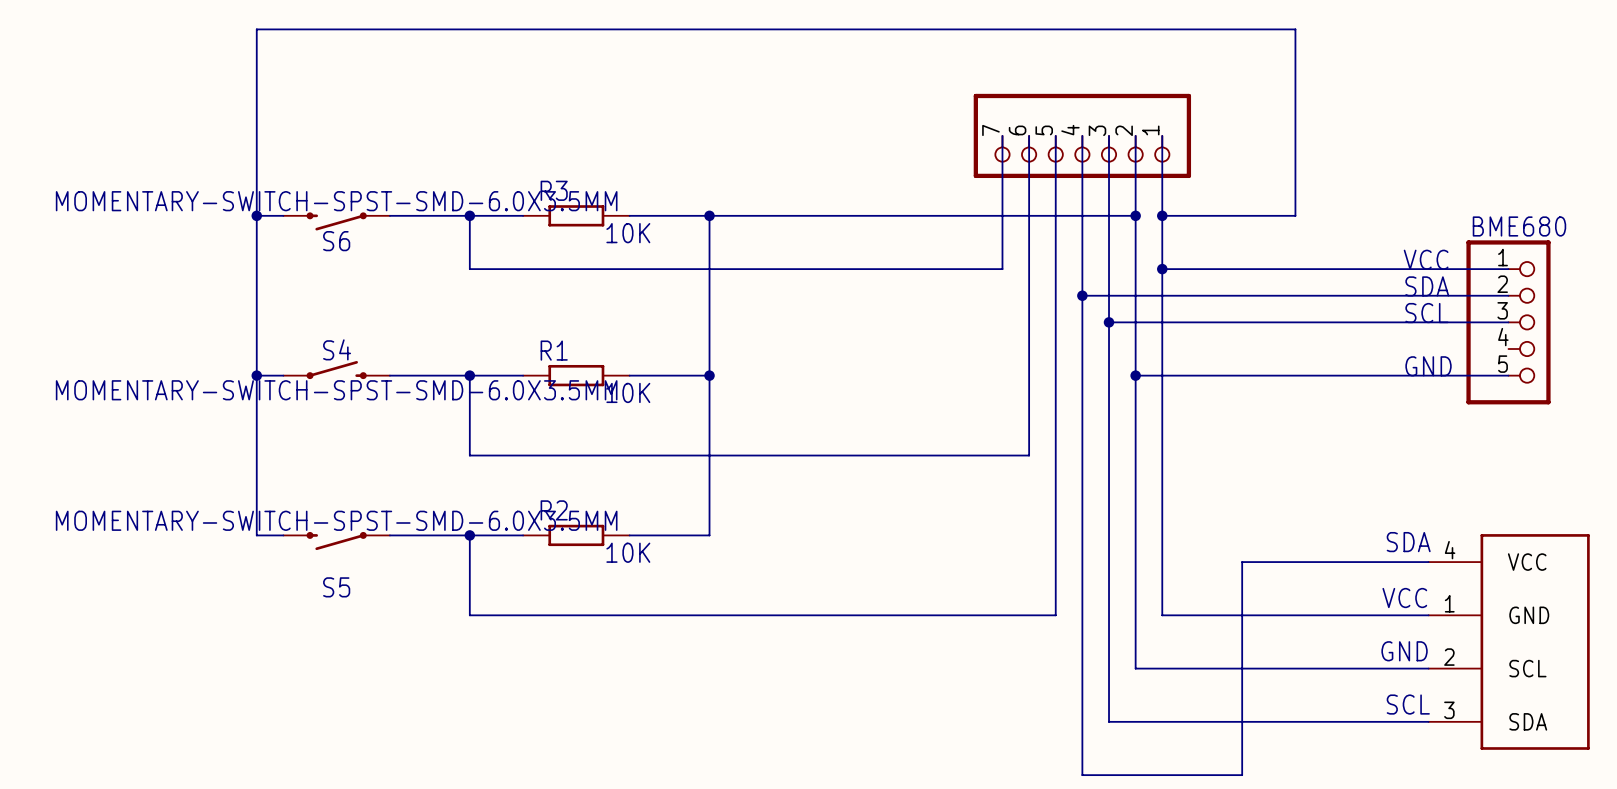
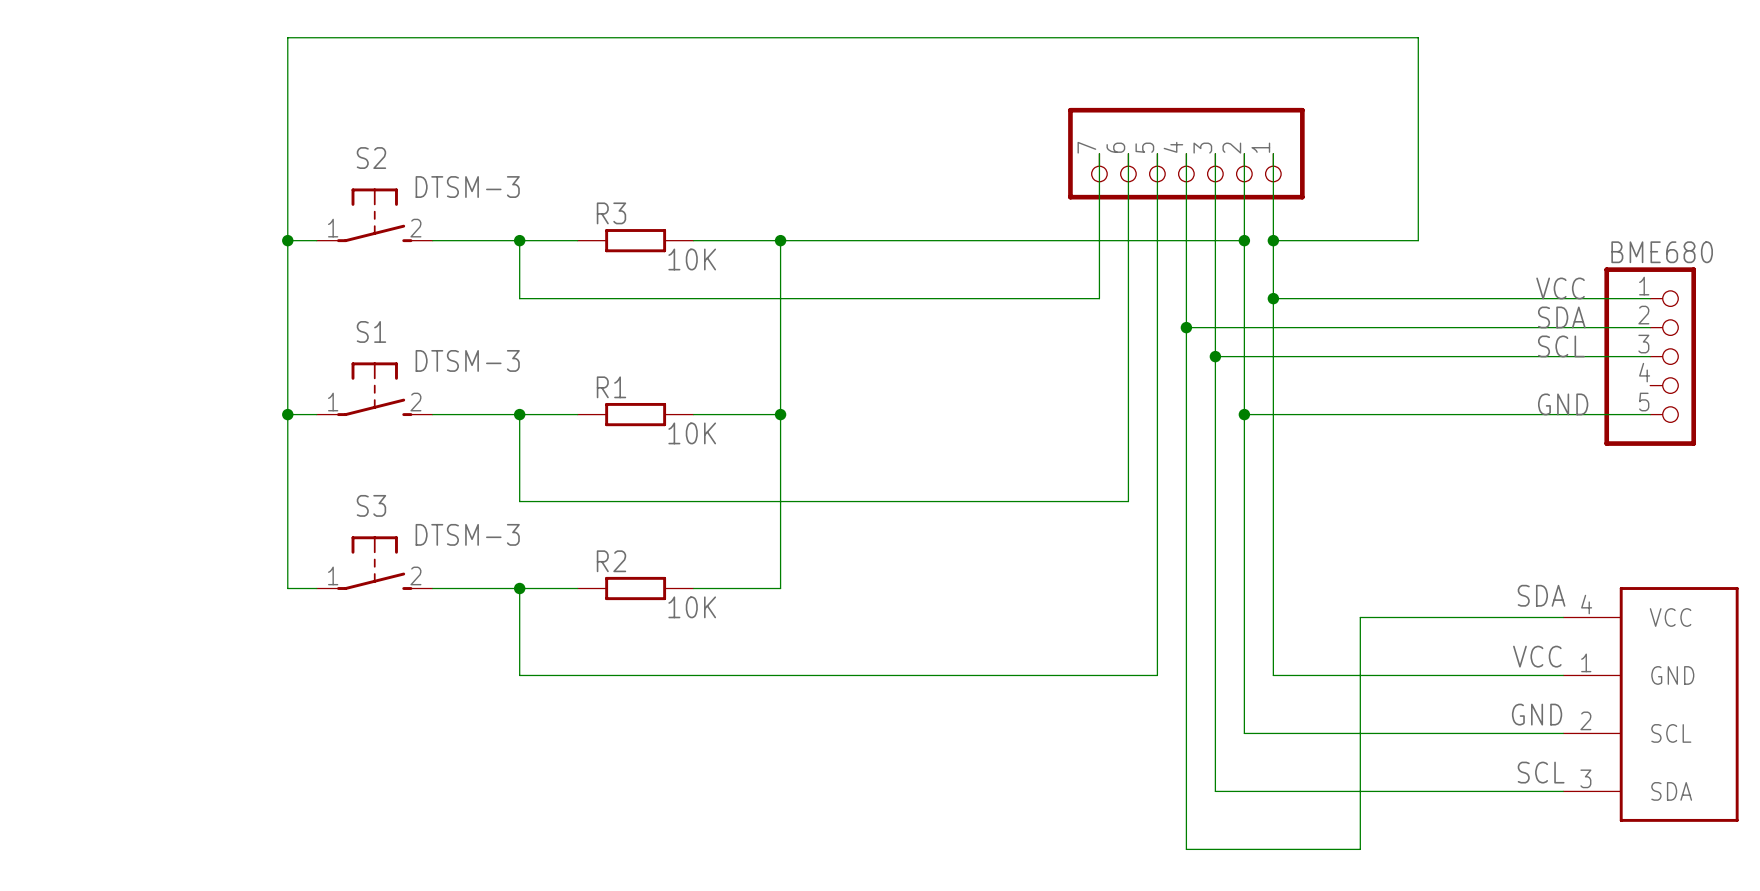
S2: none -> DTSM-3 (374, 215)
S6: MOMENTARY-SWITCH-SPST-SMD-6.0X3.5MM (336, 221) -> none
S1: none -> DTSM-3 (374, 389)
S4: MOMENTARY-SWITCH-SPST-SMD-6.0X3.5MM (336, 370) -> none
S3: none -> DTSM-3 (374, 563)
S5: MOMENTARY-SWITCH-SPST-SMD-6.0X3.5MM (336, 541) -> none

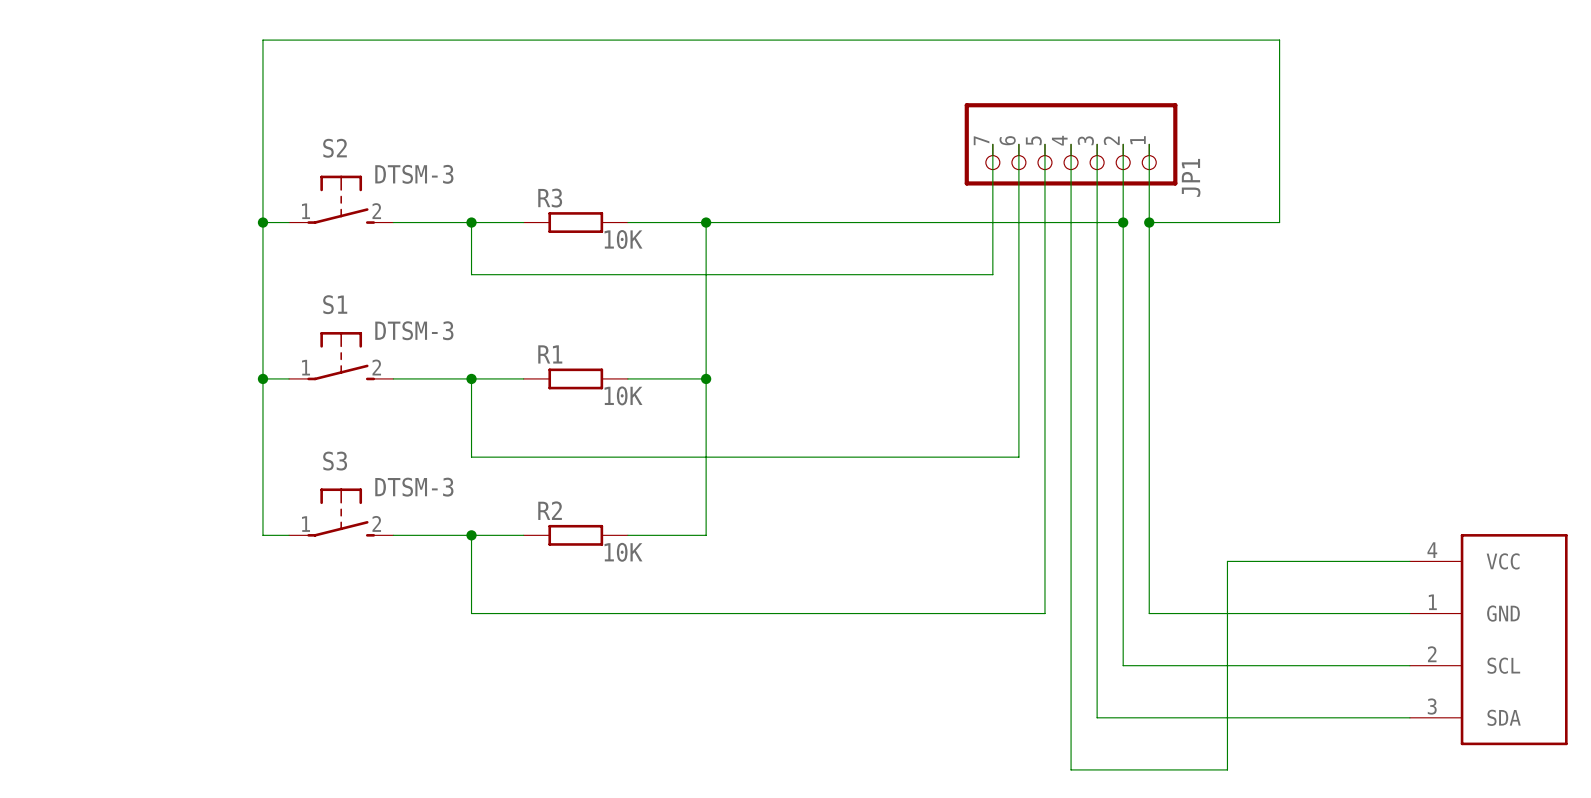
JP1 name: none -> JP1 (1191, 177)
text: VCC (1560, 288) -> none
wire: (1273, 298) (1650, 298) -> none
junction: (1273, 298) -> none
text: SDA (1561, 317) -> none
wire: (1186, 327) (1650, 327) -> none
junction: (1186, 327) -> none
text: SCL (1561, 346) -> none
wire: (1215, 356) (1650, 356) -> none
junction: (1215, 356) -> none
BME680: (1650, 356) -> none
text: GND (1563, 404) -> none
wire: (1244, 414) (1650, 414) -> none
junction: (1244, 414) -> none
text: SDA (1541, 595) -> none
text: VCC (1537, 656) -> none
text: GND (1537, 714) -> none
text: SCL (1541, 772) -> none

